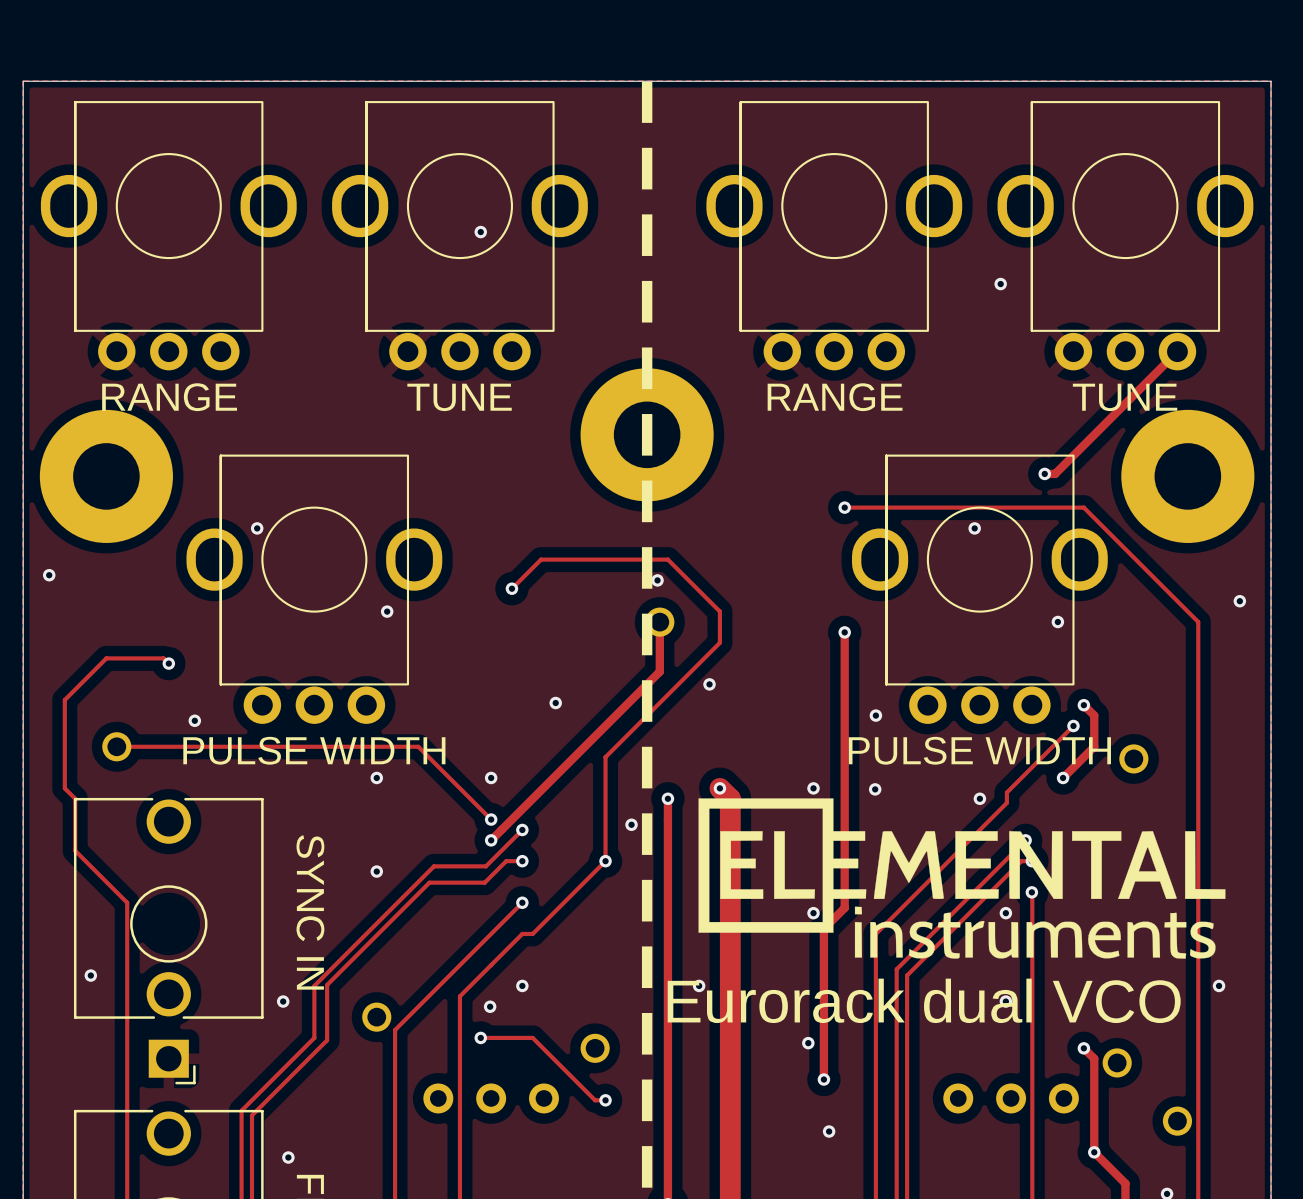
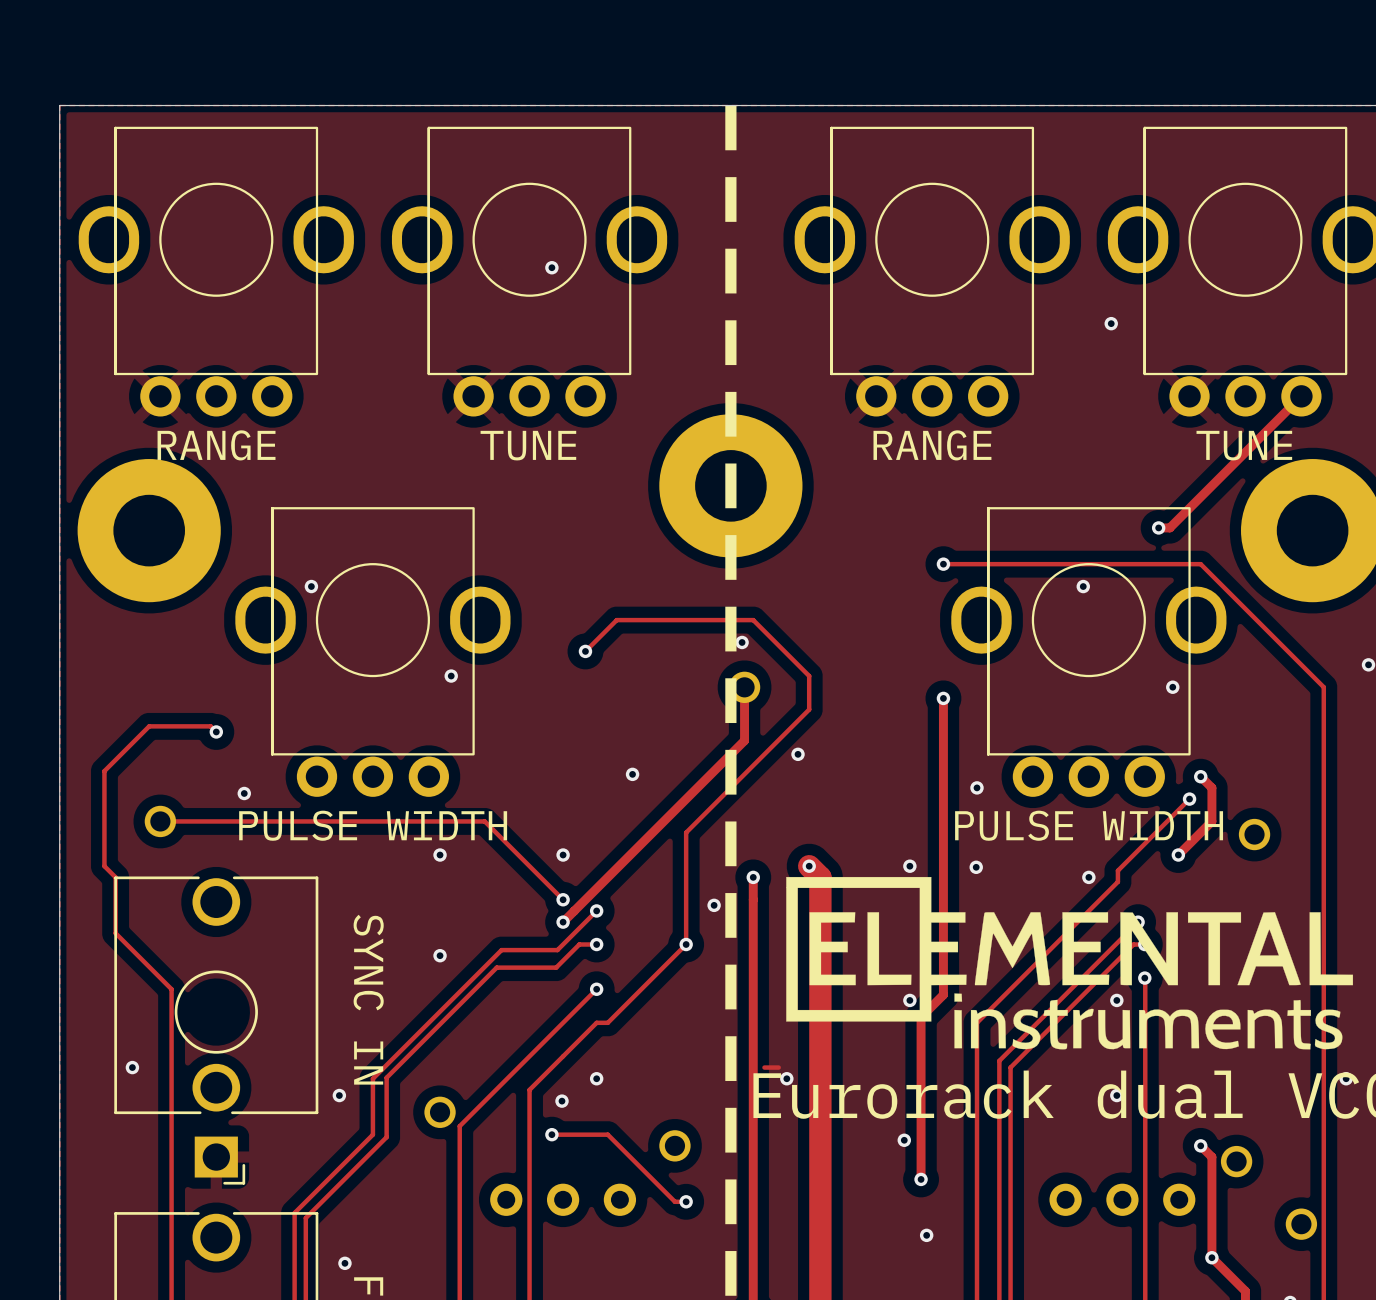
via: (49, 575) -> none
track: none -> (764, 1067) (778, 1067)

